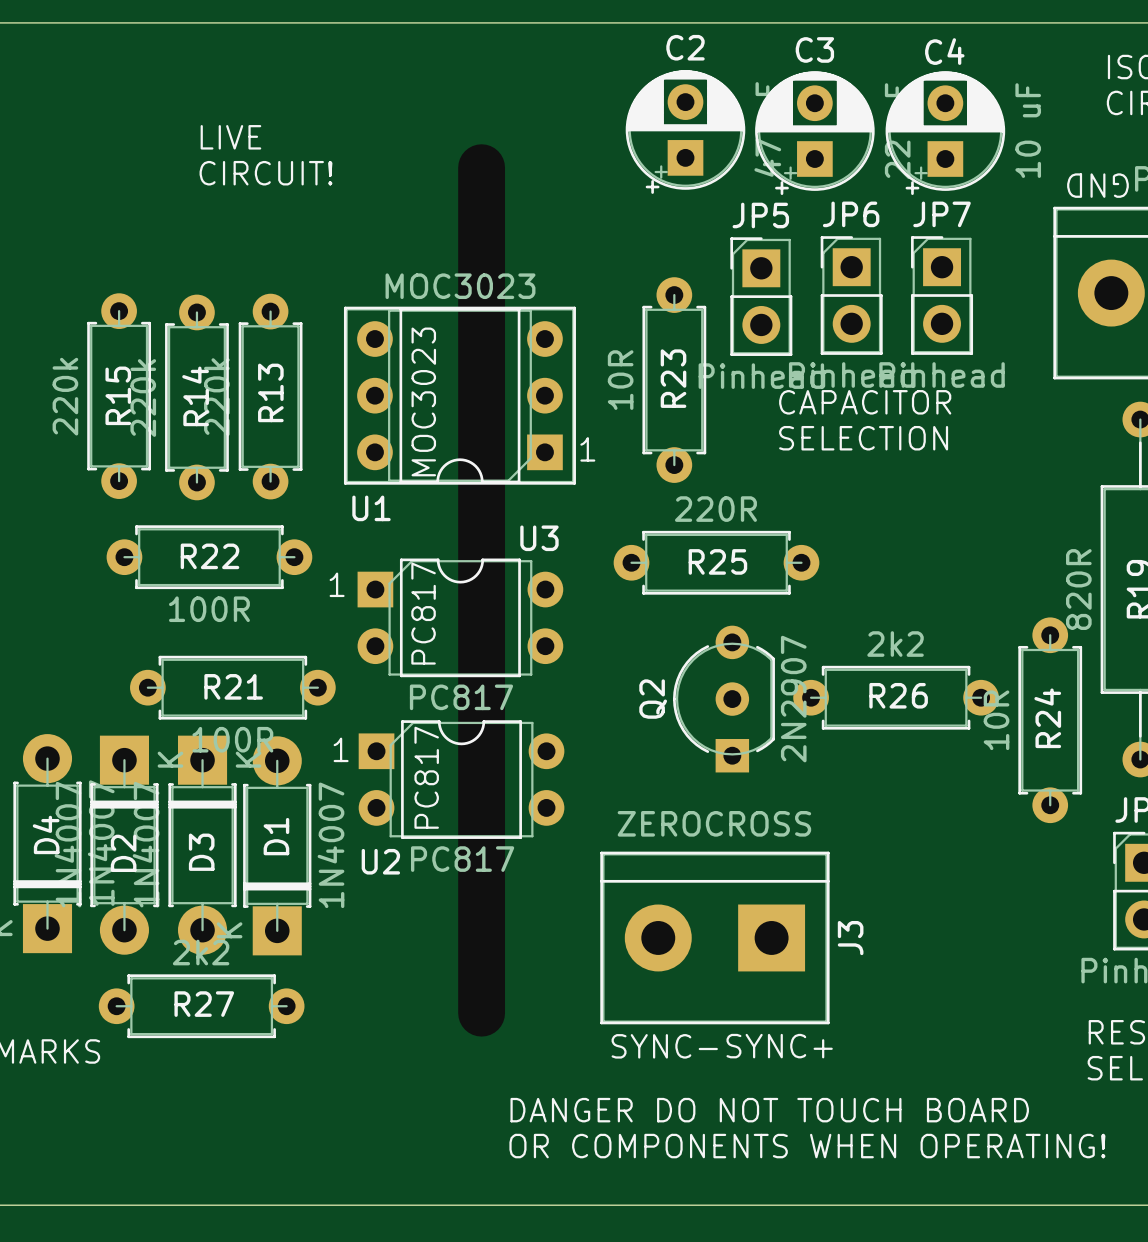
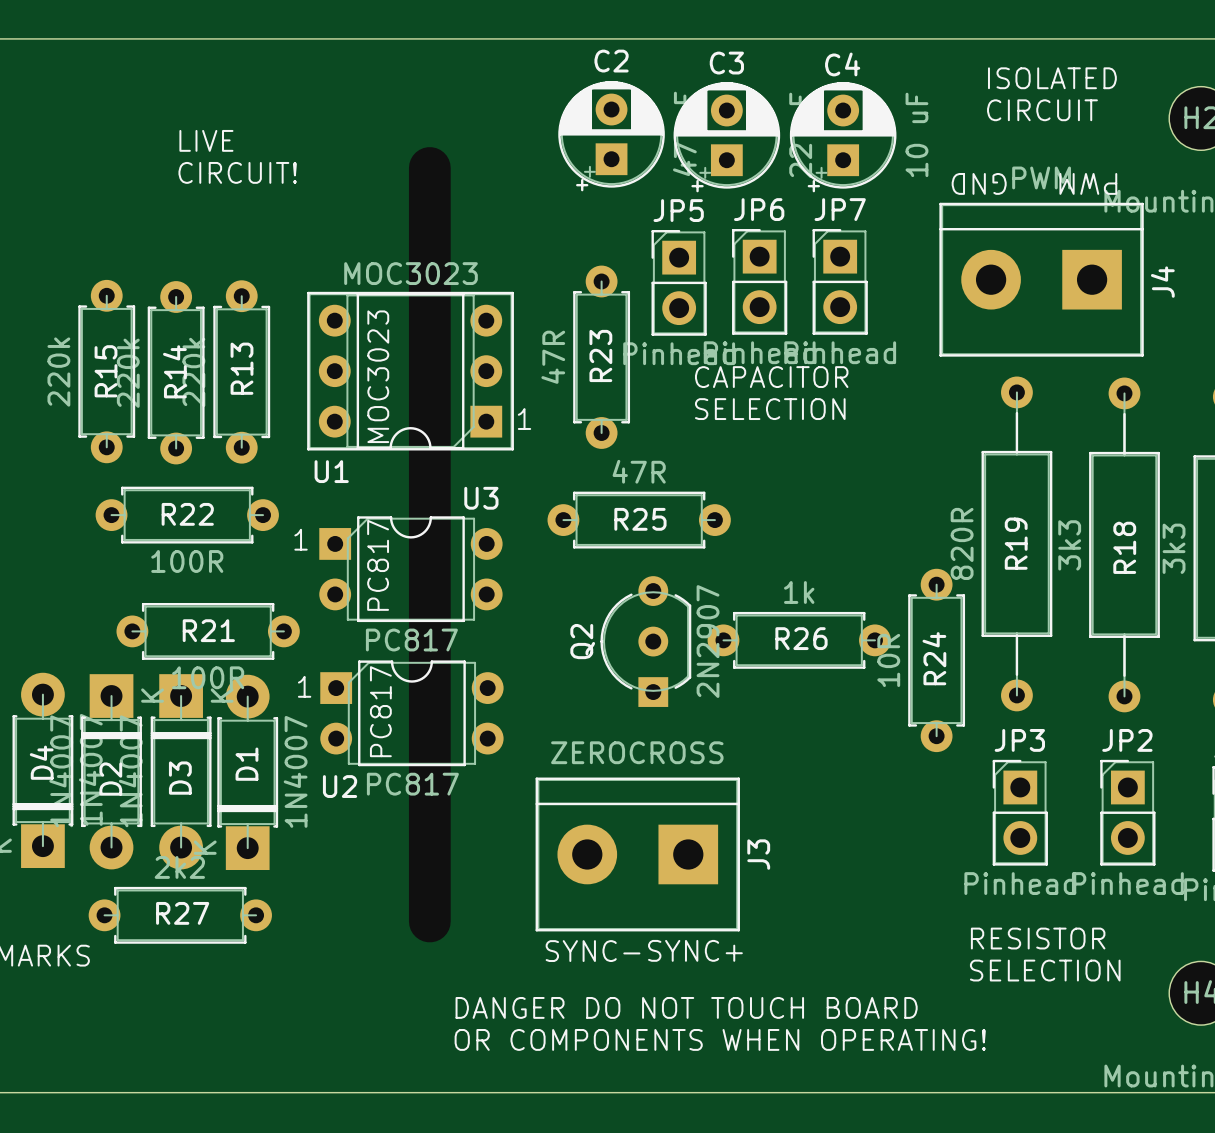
R23 value: 10R (620, 380) -> 47R (553, 357)
R25 value: 220R (715, 509) -> 47R (639, 471)
R26 value: 2k2 (895, 644) -> 1k (799, 592)

